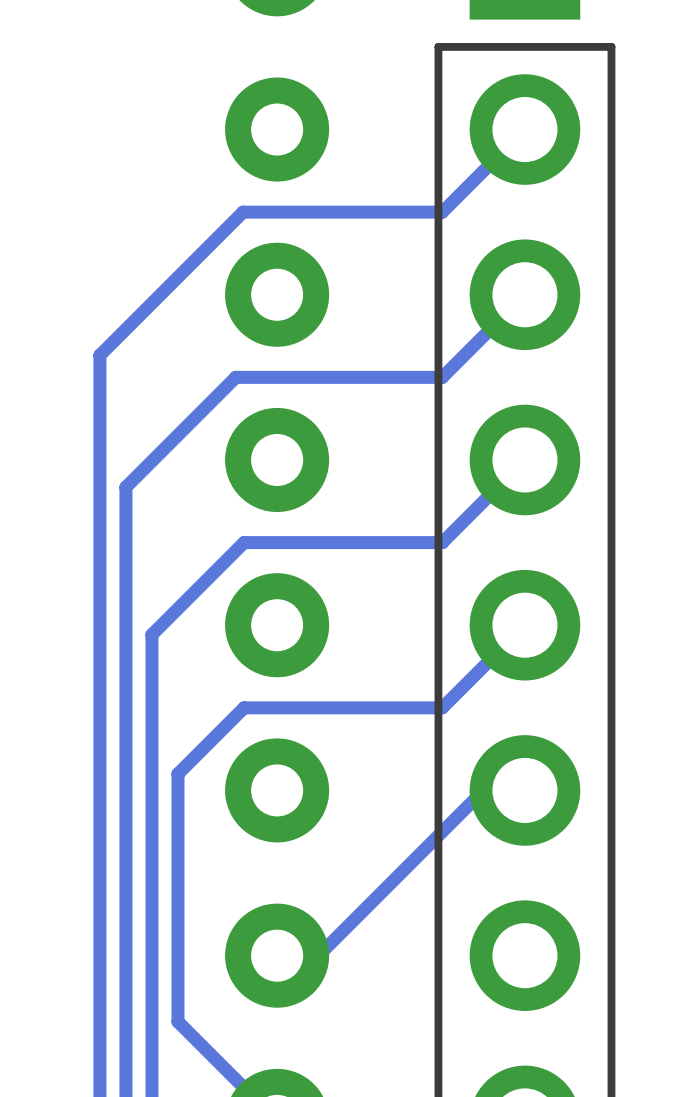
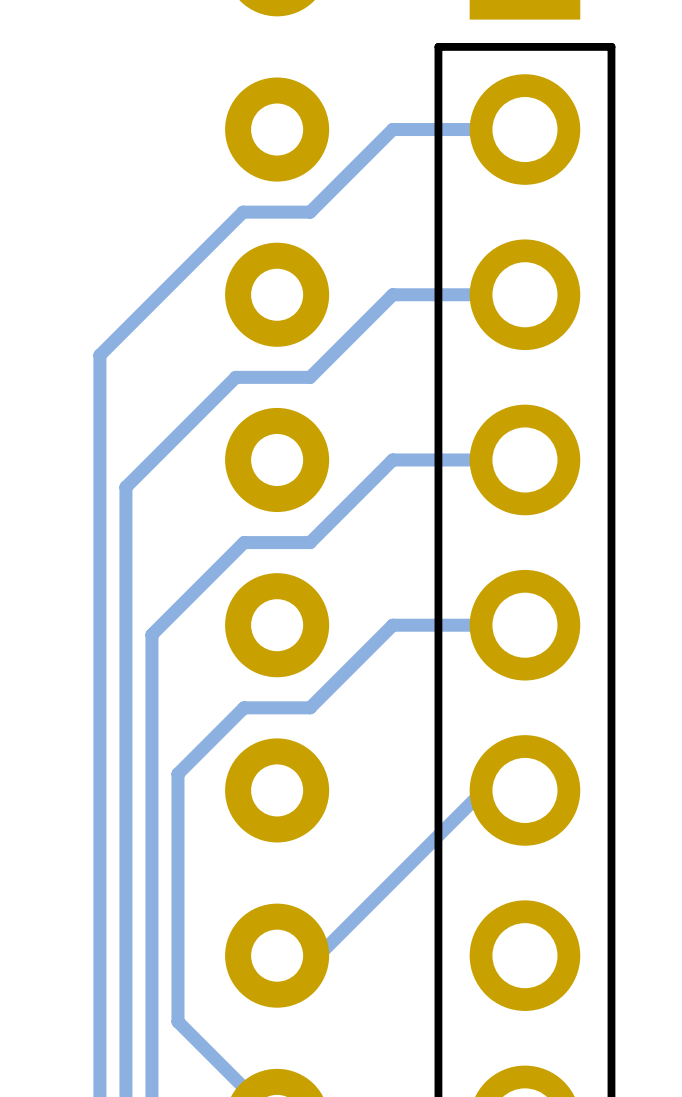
track: (524, 129) (442, 212) (310, 212) -> (524, 129) (392, 129) (310, 212)
track: (524, 294) (442, 377) (310, 377) -> (524, 294) (392, 294) (310, 377)
track: (524, 459) (442, 542) (310, 542) -> (524, 459) (392, 459) (310, 542)
track: (524, 625) (442, 707) (310, 707) -> (524, 625) (392, 625) (310, 707)

